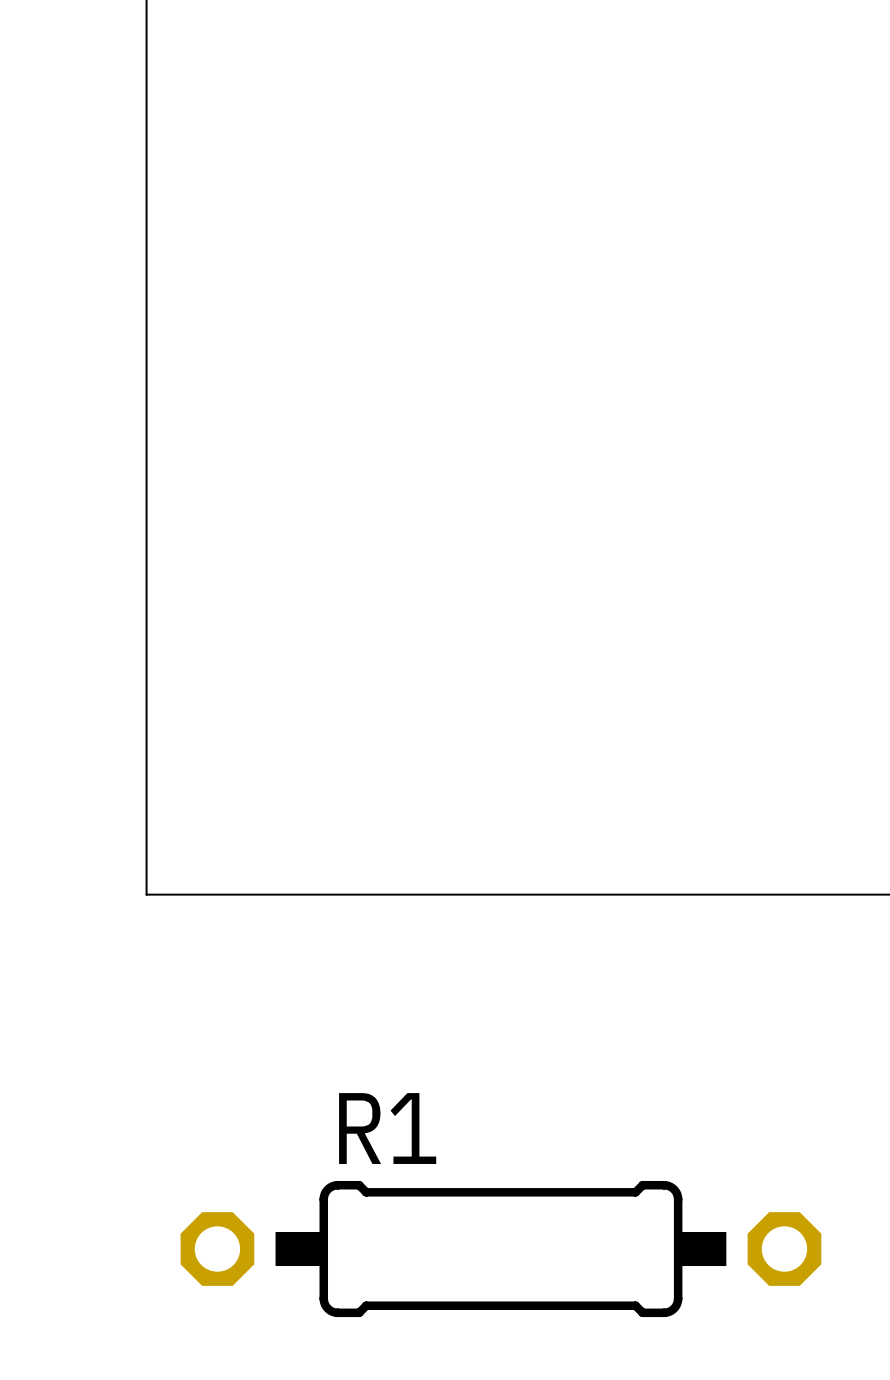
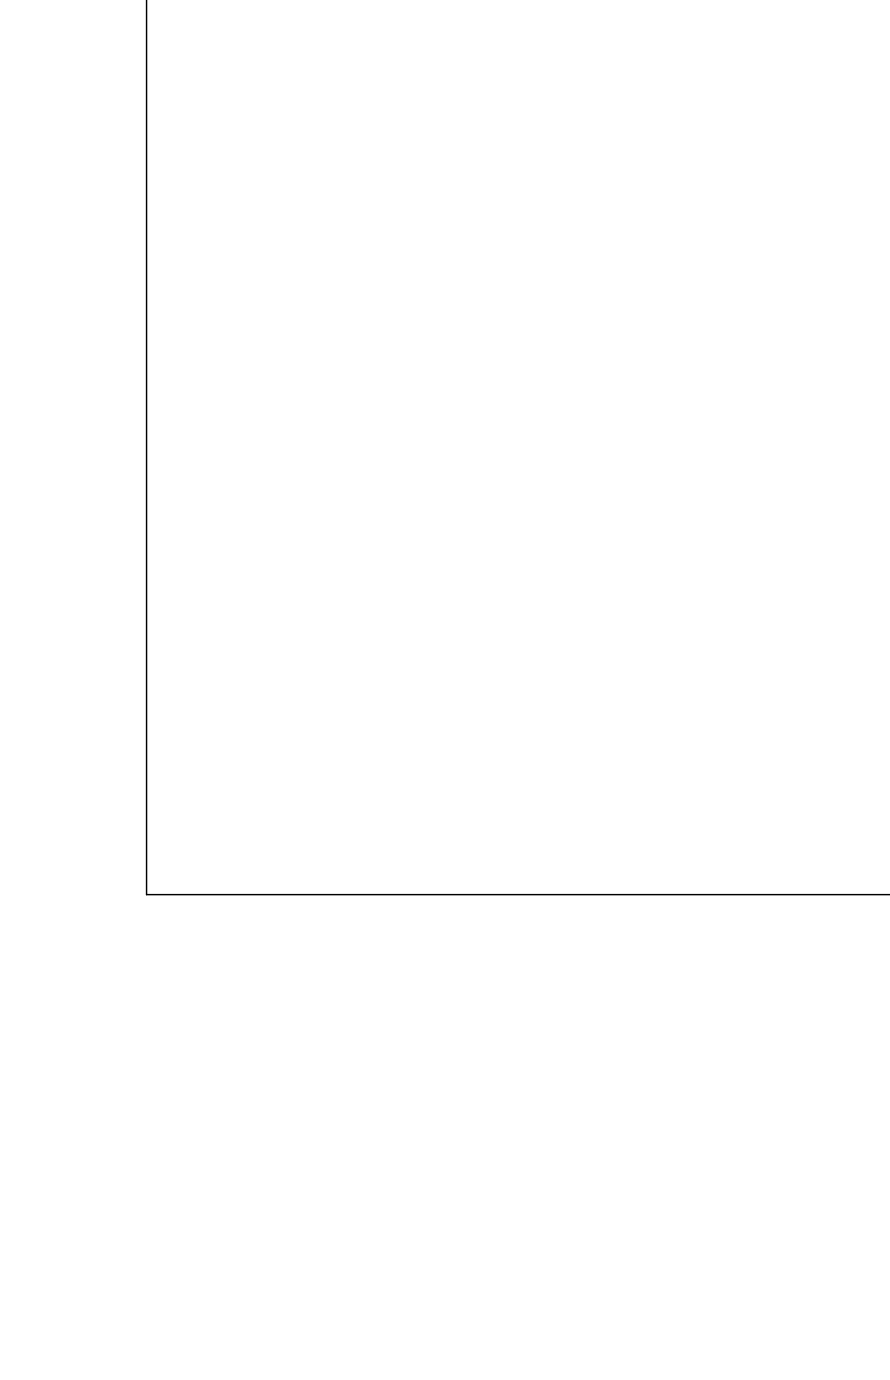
R1: (500, 1249) -> none

